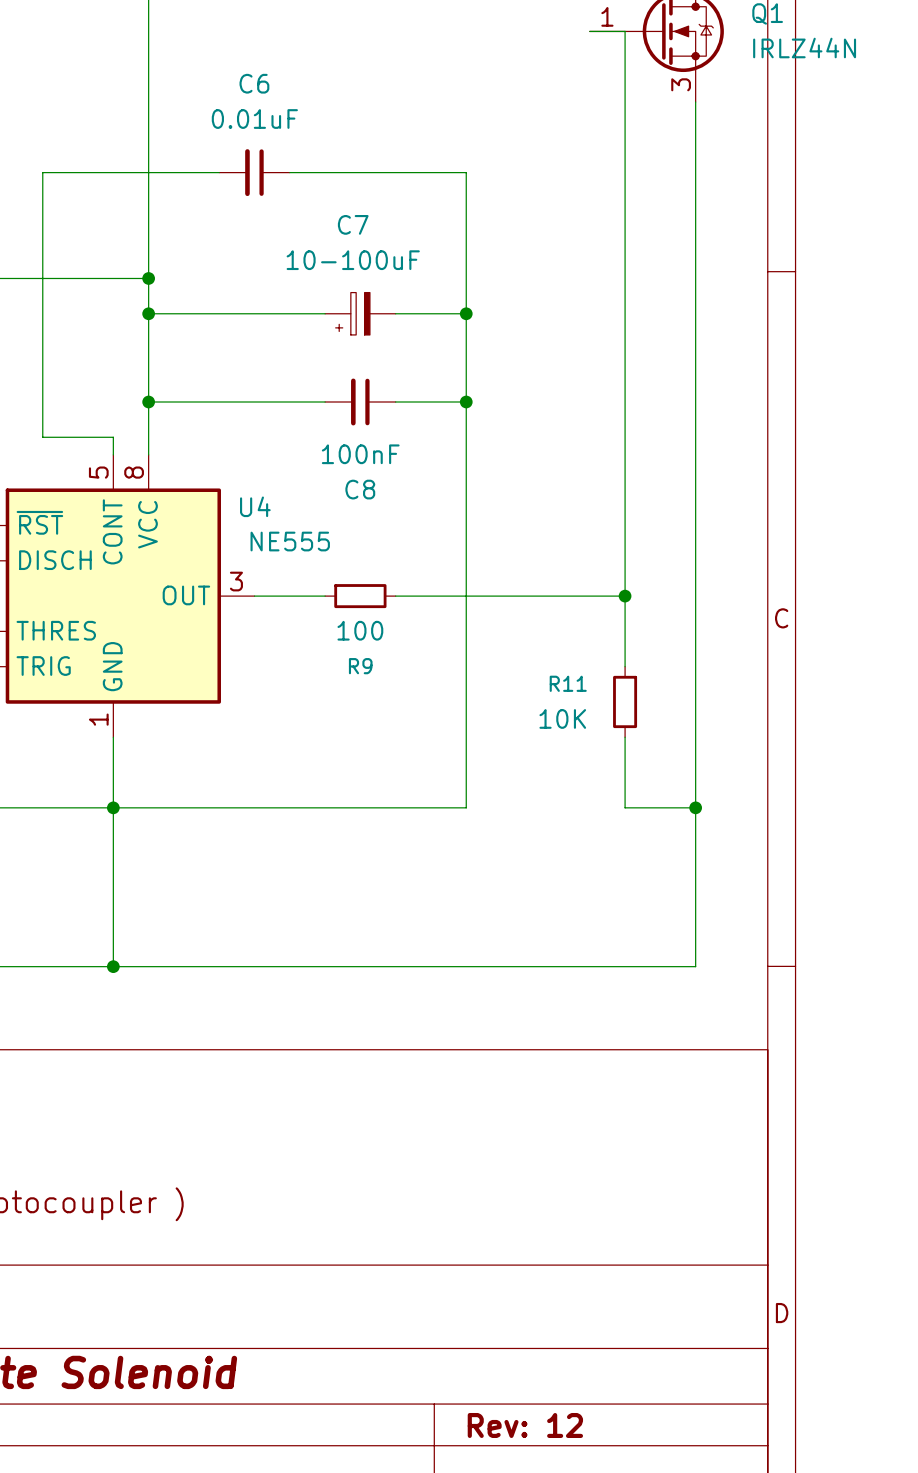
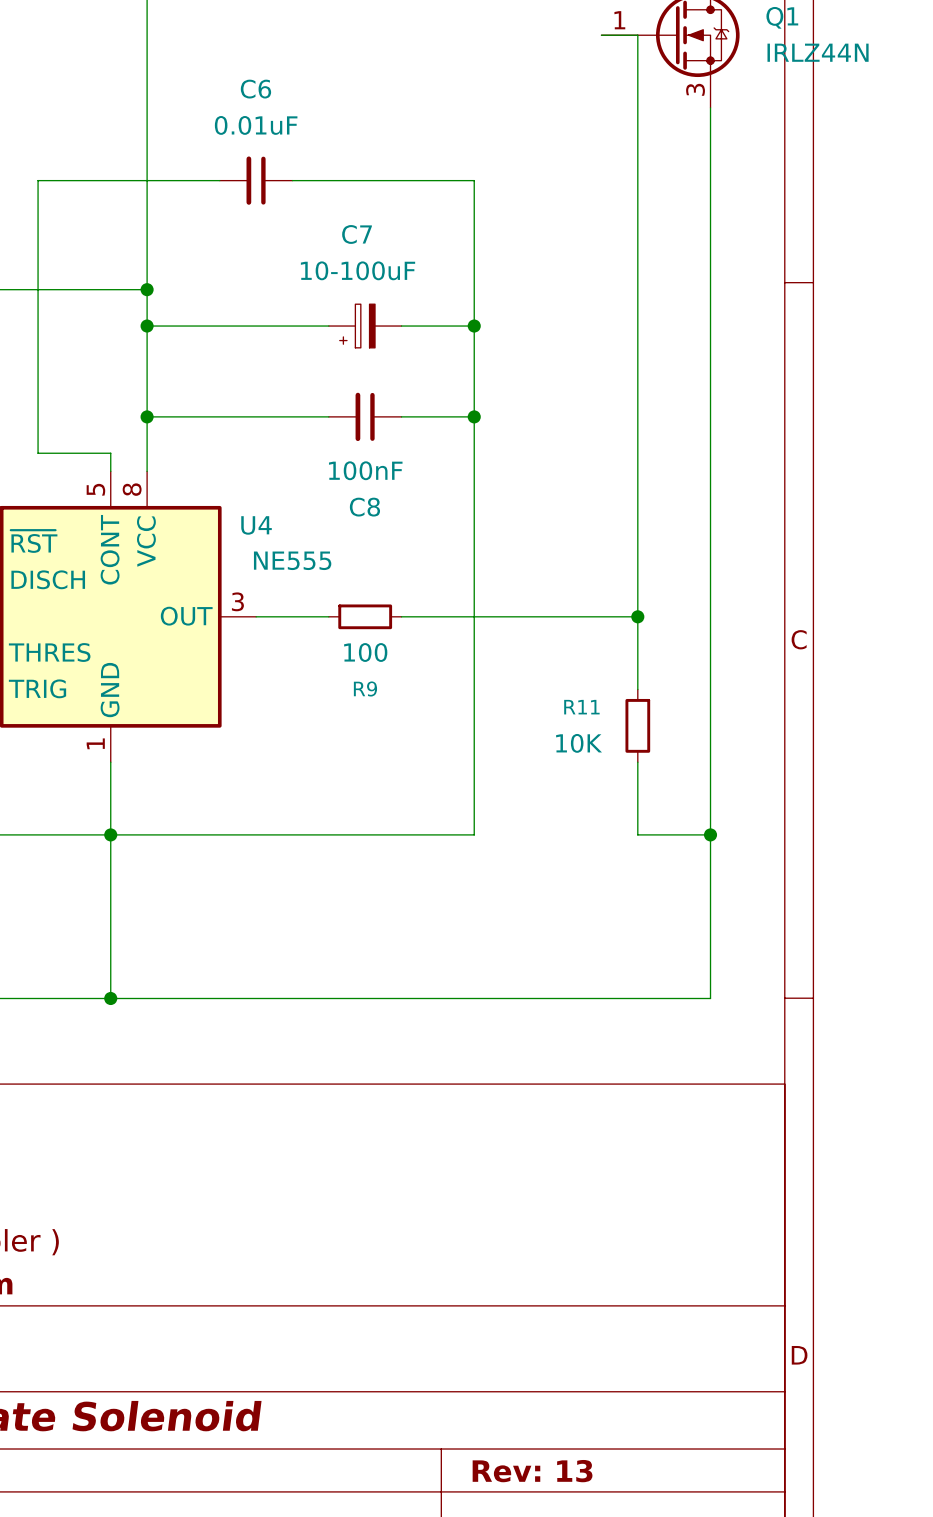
title block: Rev: 12 (525, 1425) -> Rev: 13 (532, 1471)

